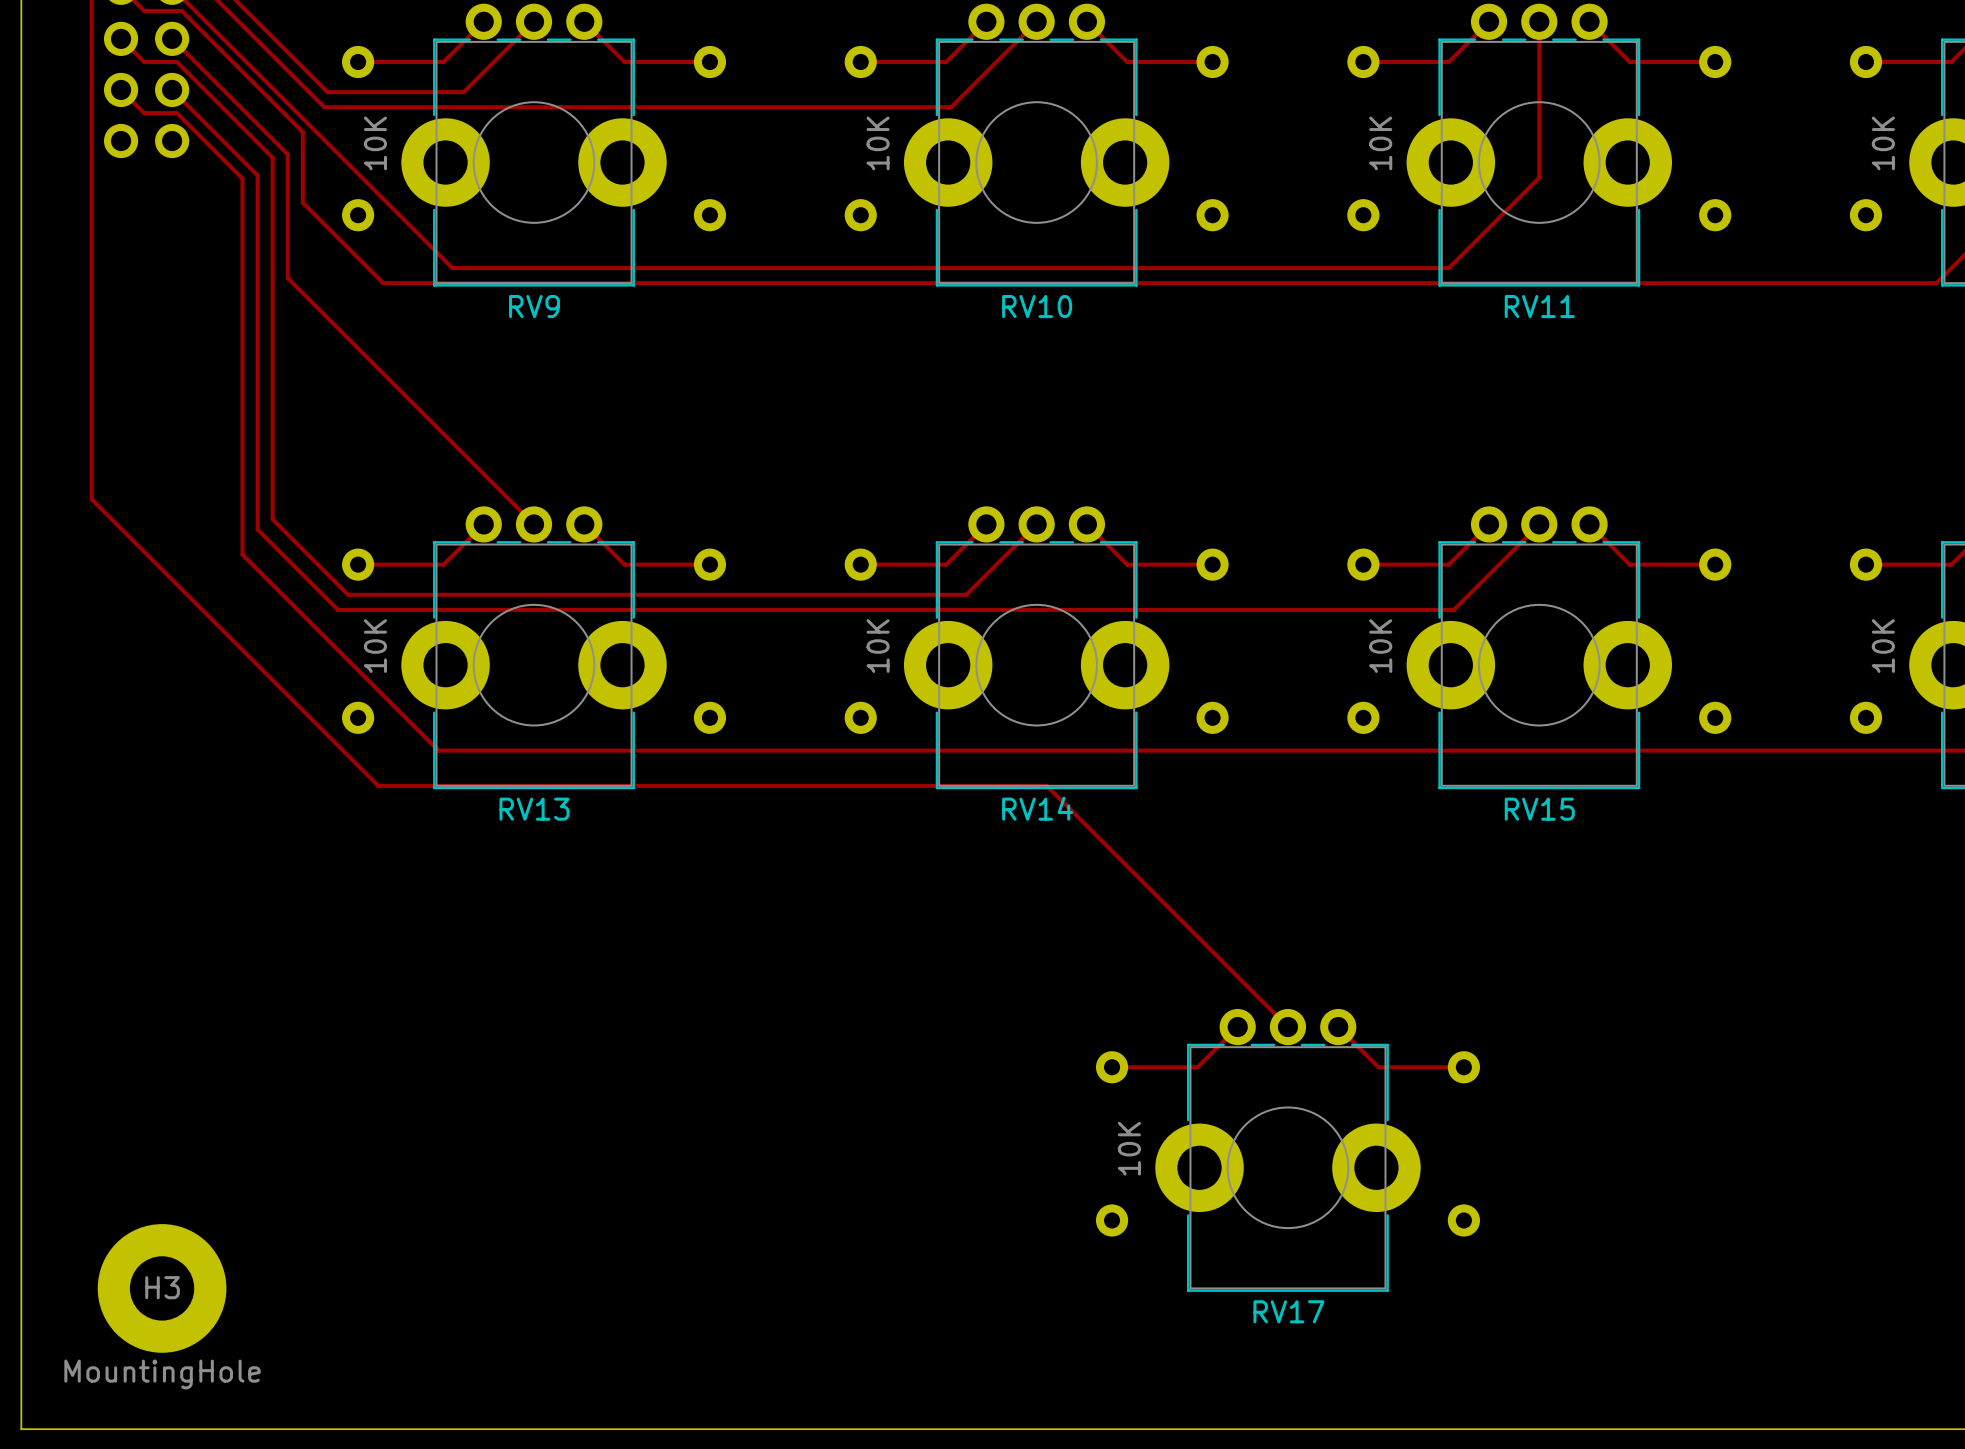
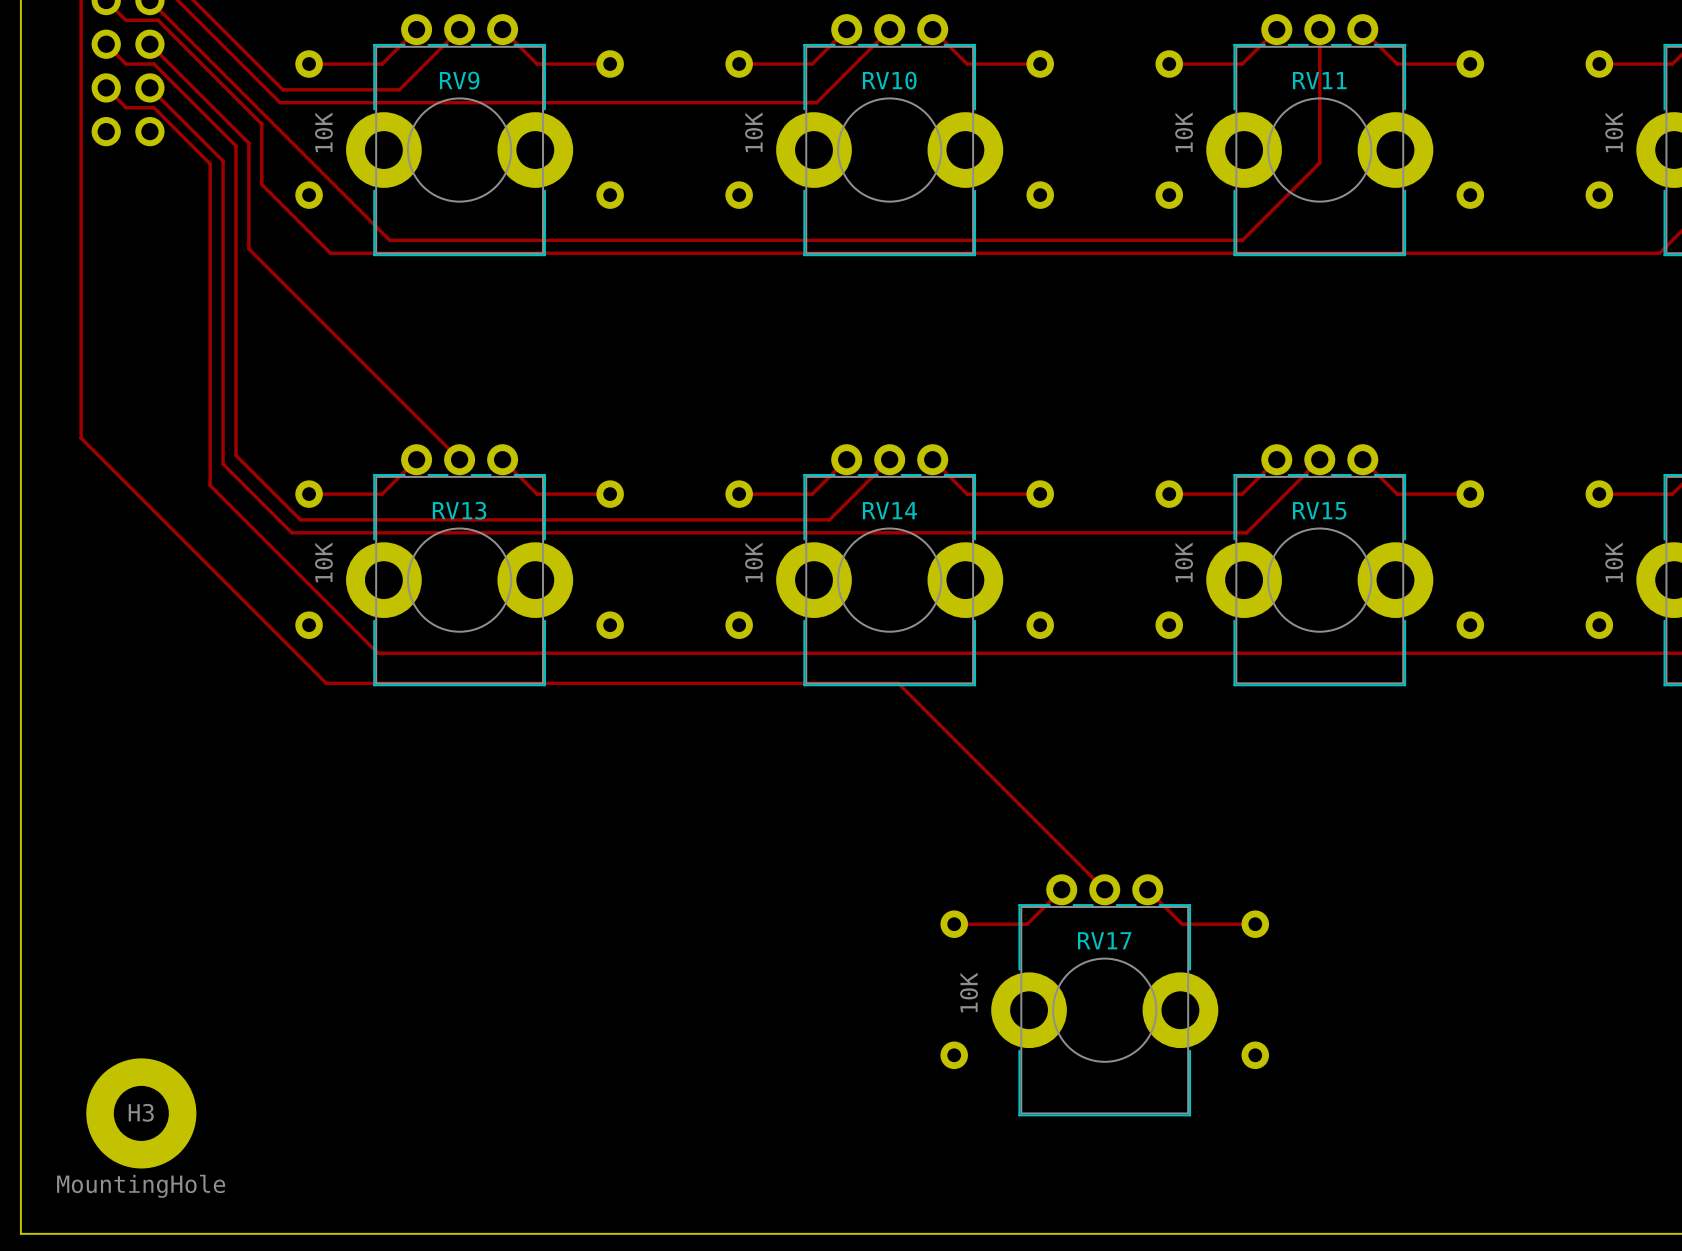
RV9 name position: RV9 (534, 306) -> RV9 (459, 80)
RV10 name position: RV10 (1037, 306) -> RV10 (889, 80)
RV11 name position: RV11 (1539, 306) -> RV11 (1319, 80)
RV14 name position: RV14 (1037, 808) -> RV14 (889, 510)
RV13 name position: RV13 (534, 809) -> RV13 (459, 510)
RV15 name position: RV15 (1539, 809) -> RV15 (1319, 510)
RV17 name position: RV17 (1288, 1311) -> RV17 (1104, 940)

